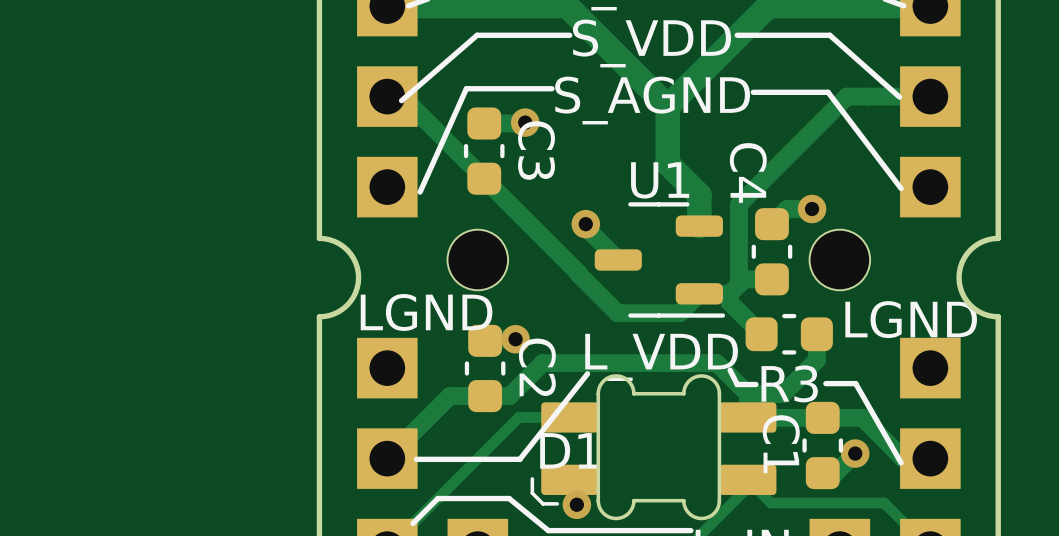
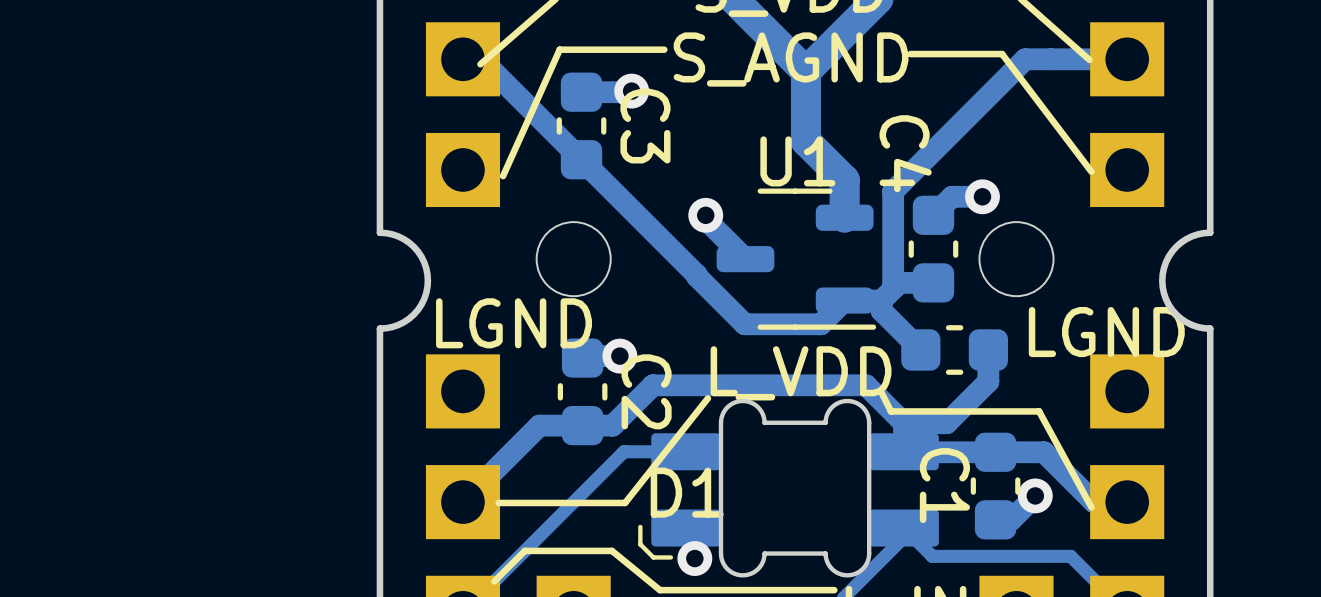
R3 name: R3 (789, 383) -> none
line: (825, 383) (855, 383) (901, 462) -> (913, 411) (1039, 411) (1091, 507)

